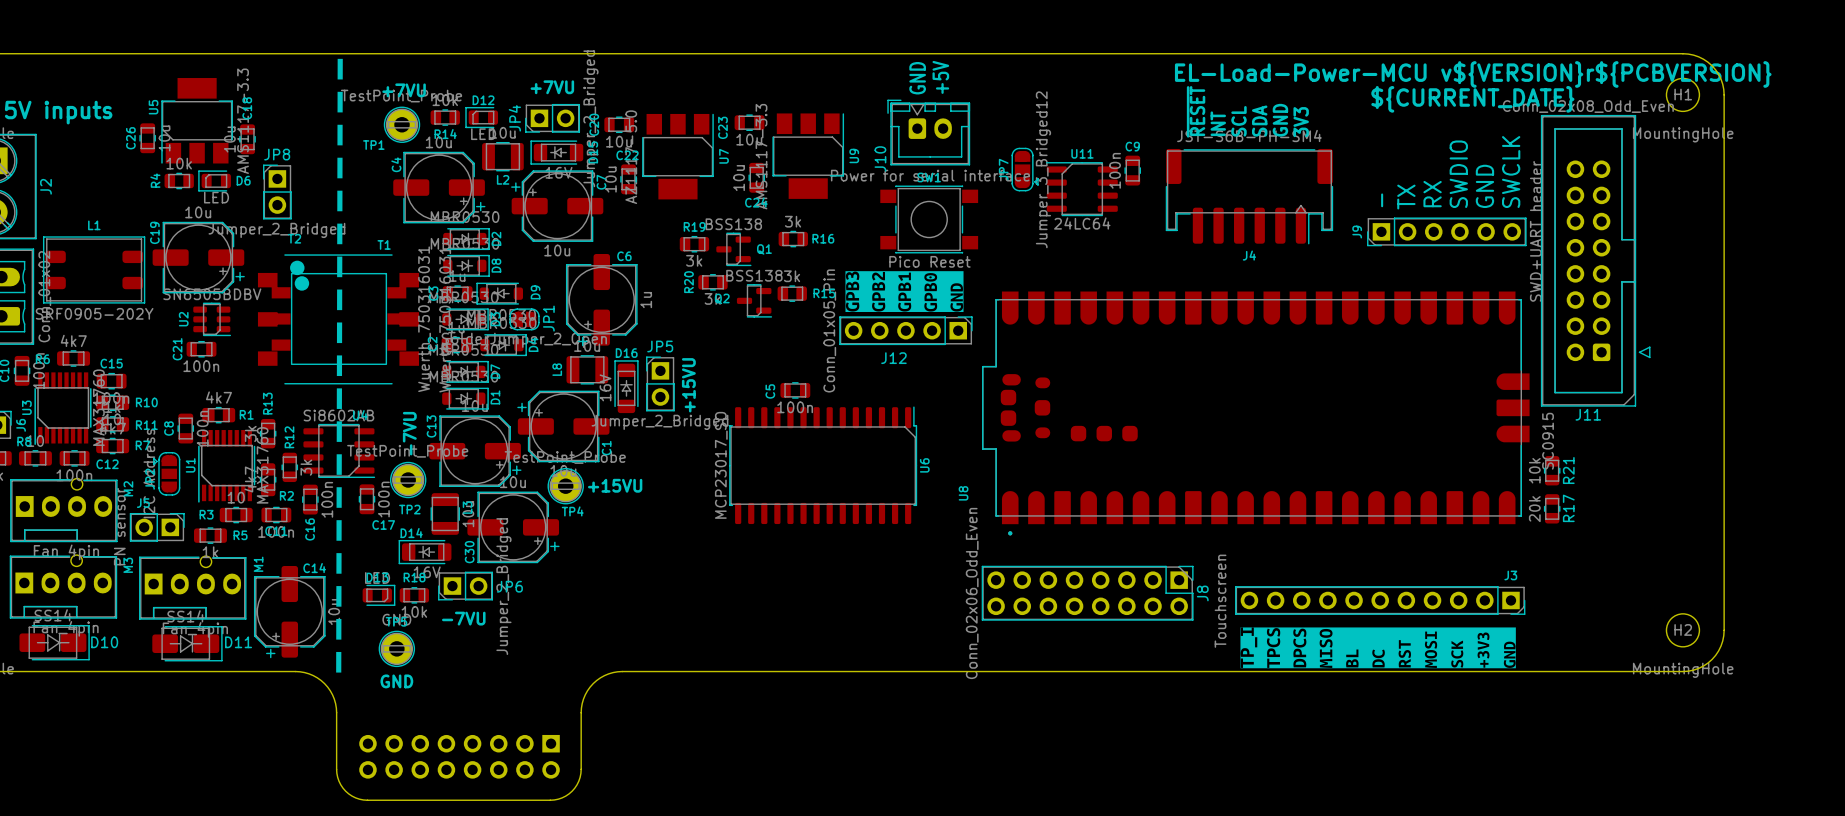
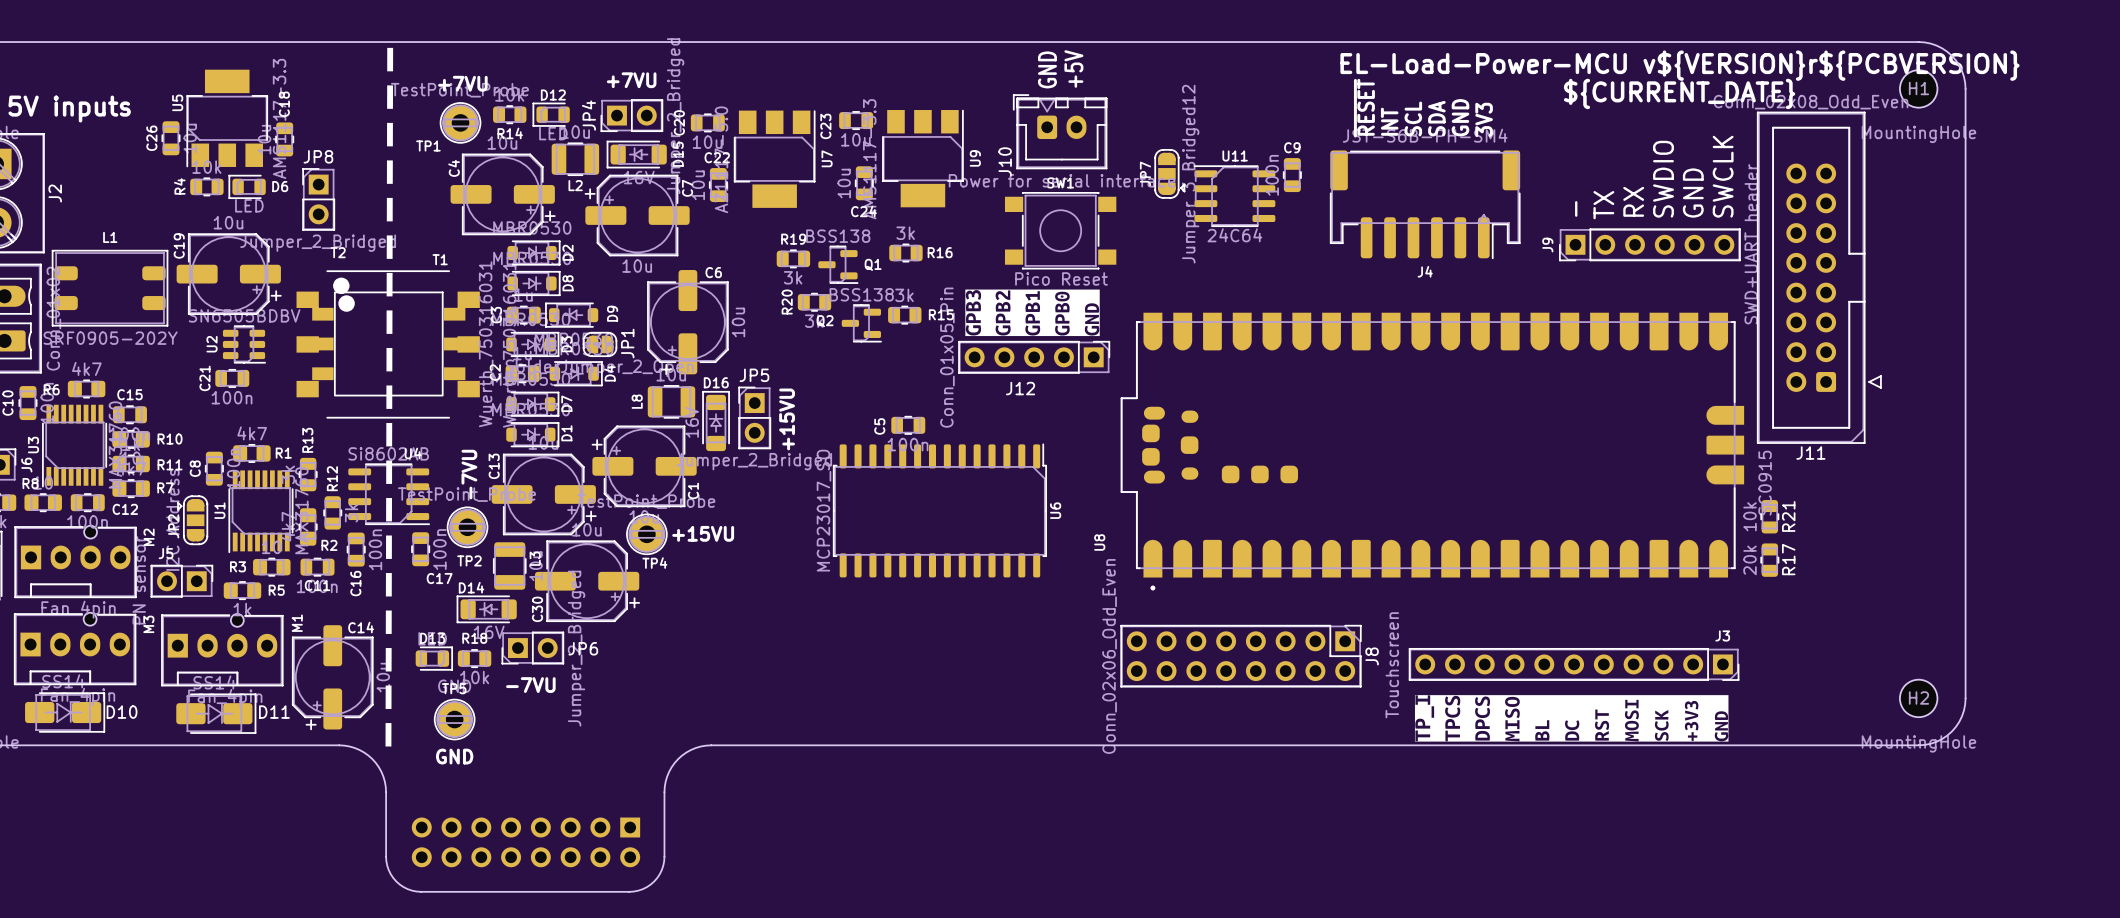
U11 value: 24LC64 (1082, 223) -> 24C64 (1234, 235)
C6 value: 1u (646, 300) -> 10u (738, 322)

